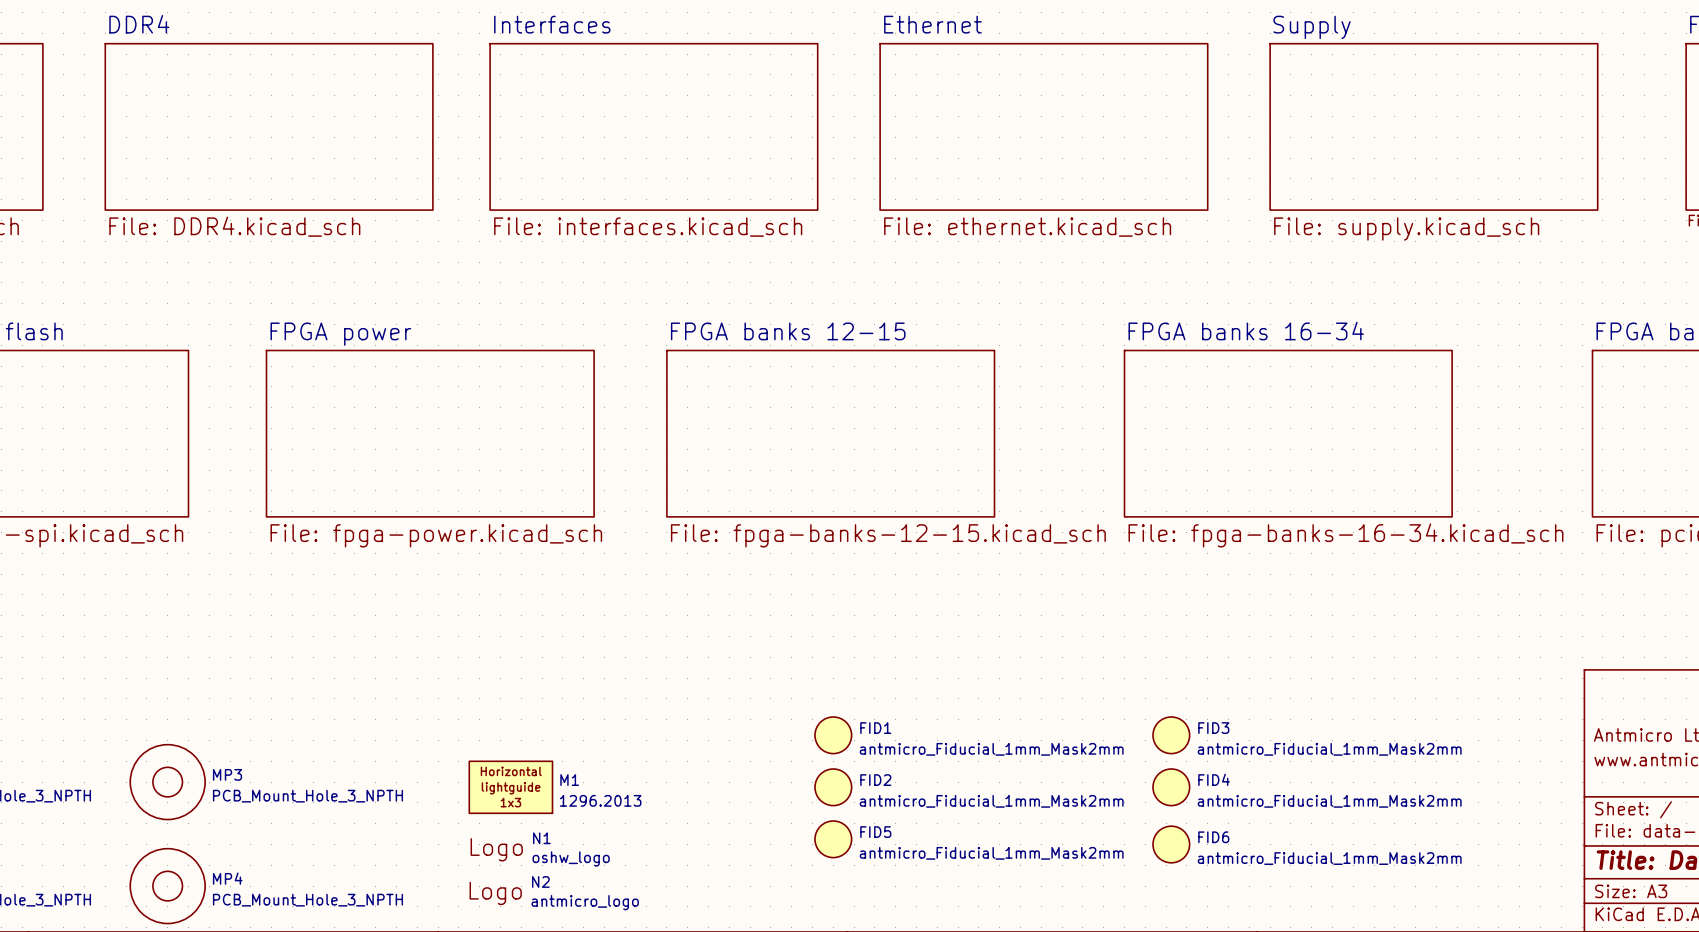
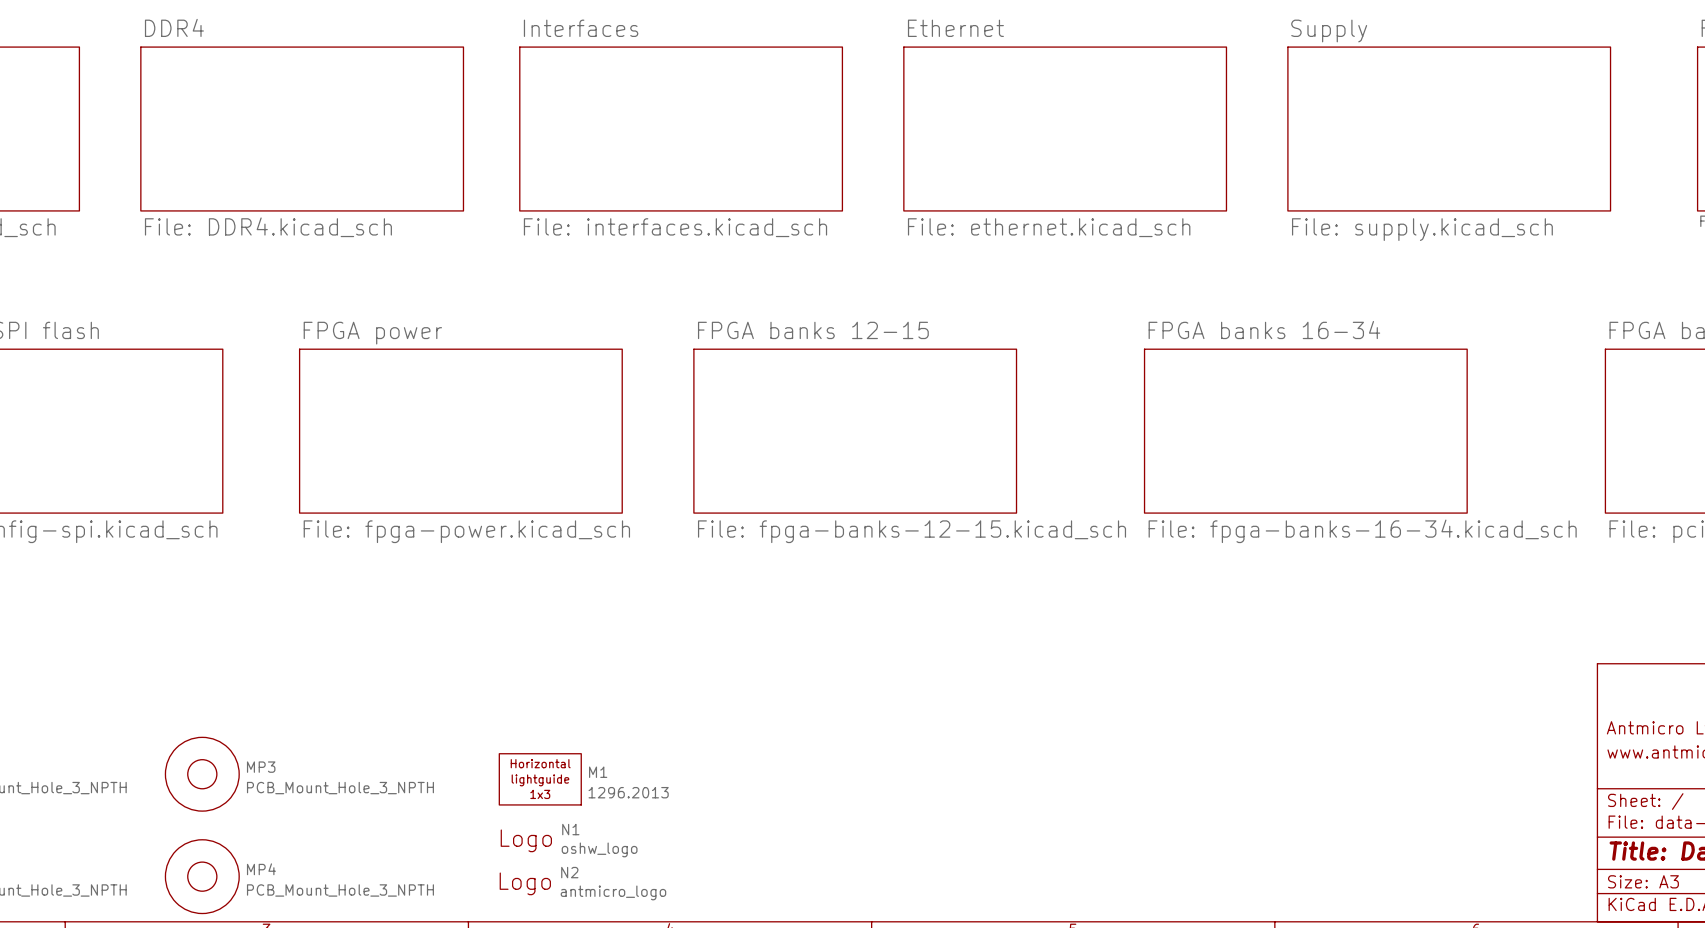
FID1: antmicro_Fiducial_1mm_Mask2mm (833, 735) -> none
FID3: antmicro_Fiducial_1mm_Mask2mm (1171, 735) -> none
FID2: antmicro_Fiducial_1mm_Mask2mm (833, 787) -> none
FID4: antmicro_Fiducial_1mm_Mask2mm (1171, 787) -> none
FID5: antmicro_Fiducial_1mm_Mask2mm (833, 839) -> none
FID6: antmicro_Fiducial_1mm_Mask2mm (1171, 844) -> none

